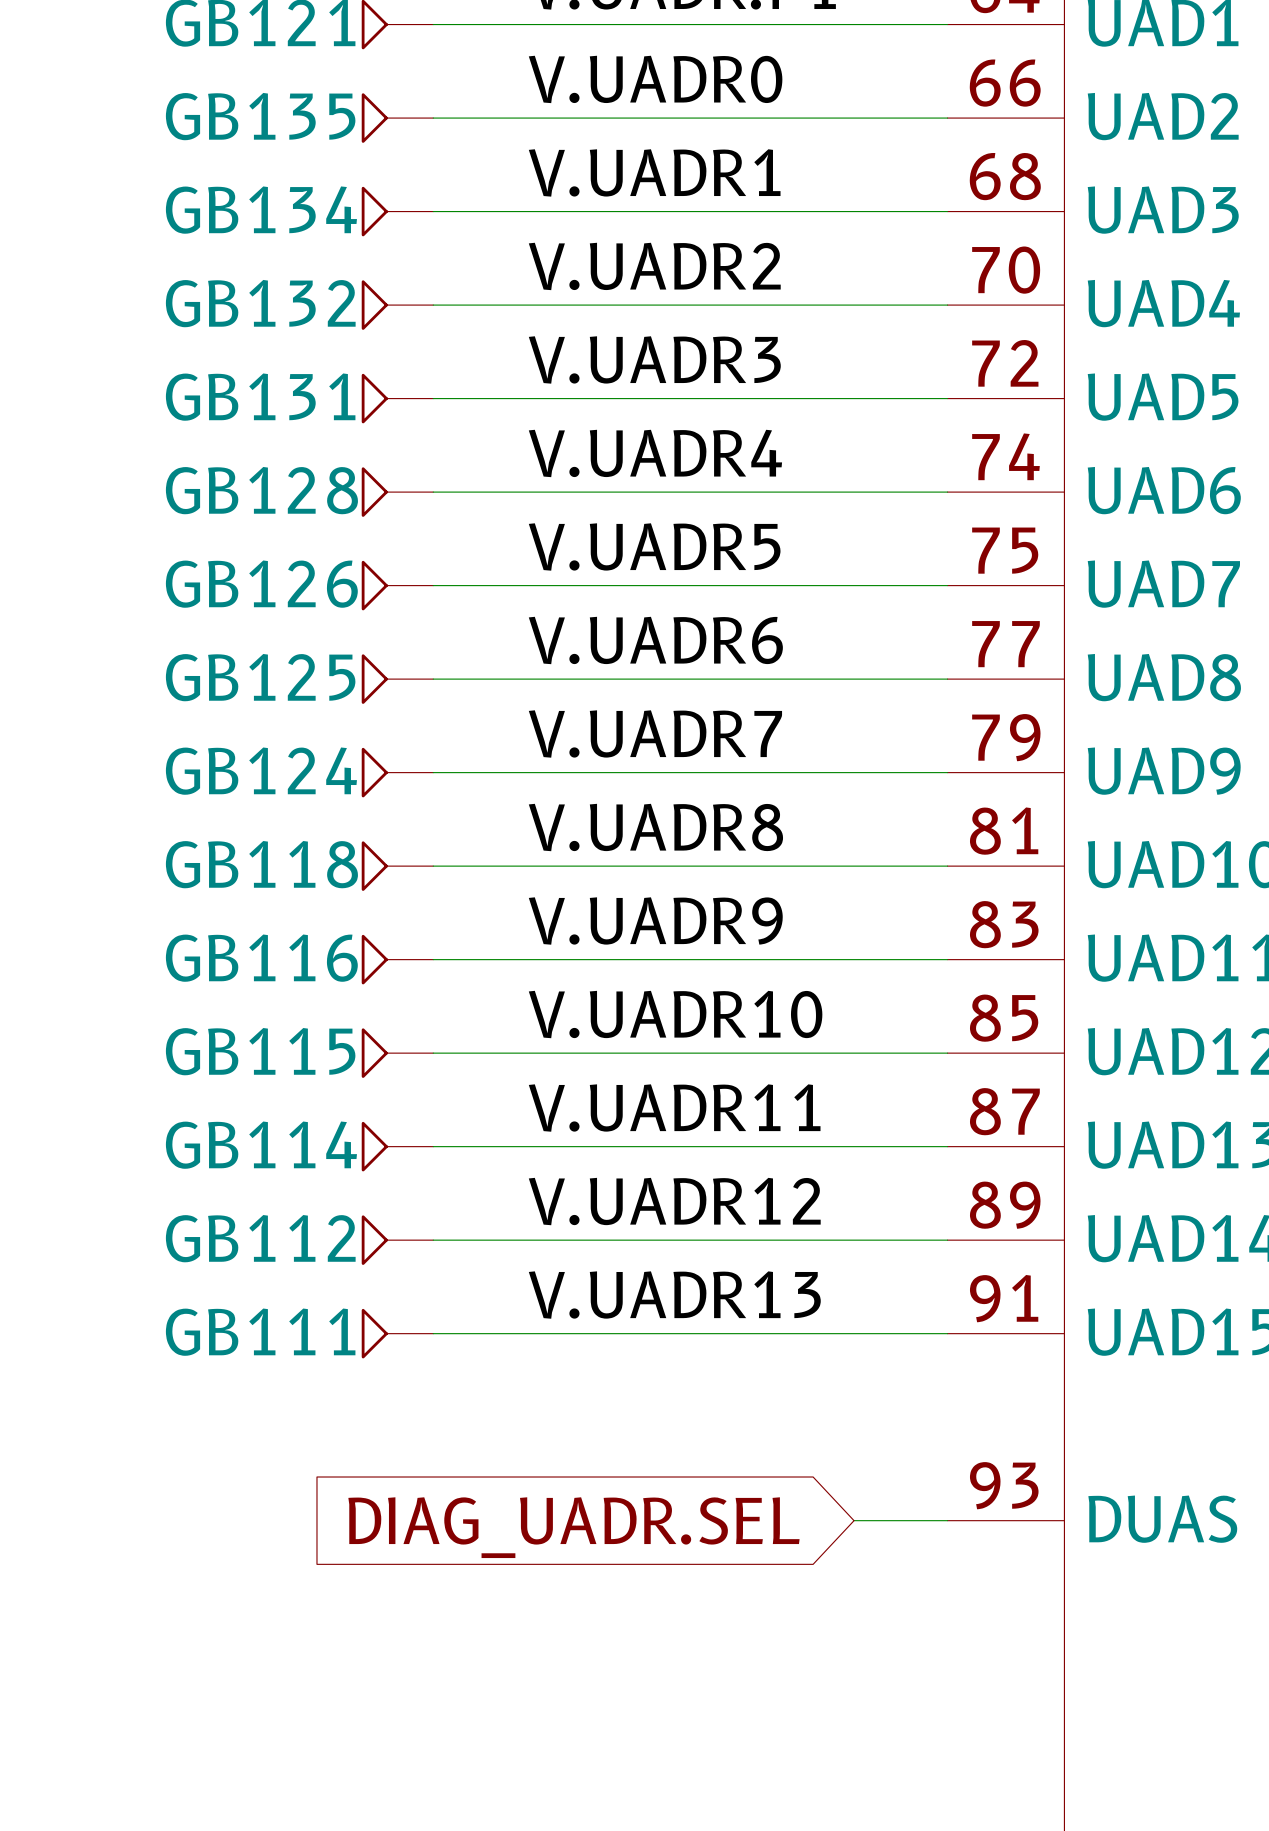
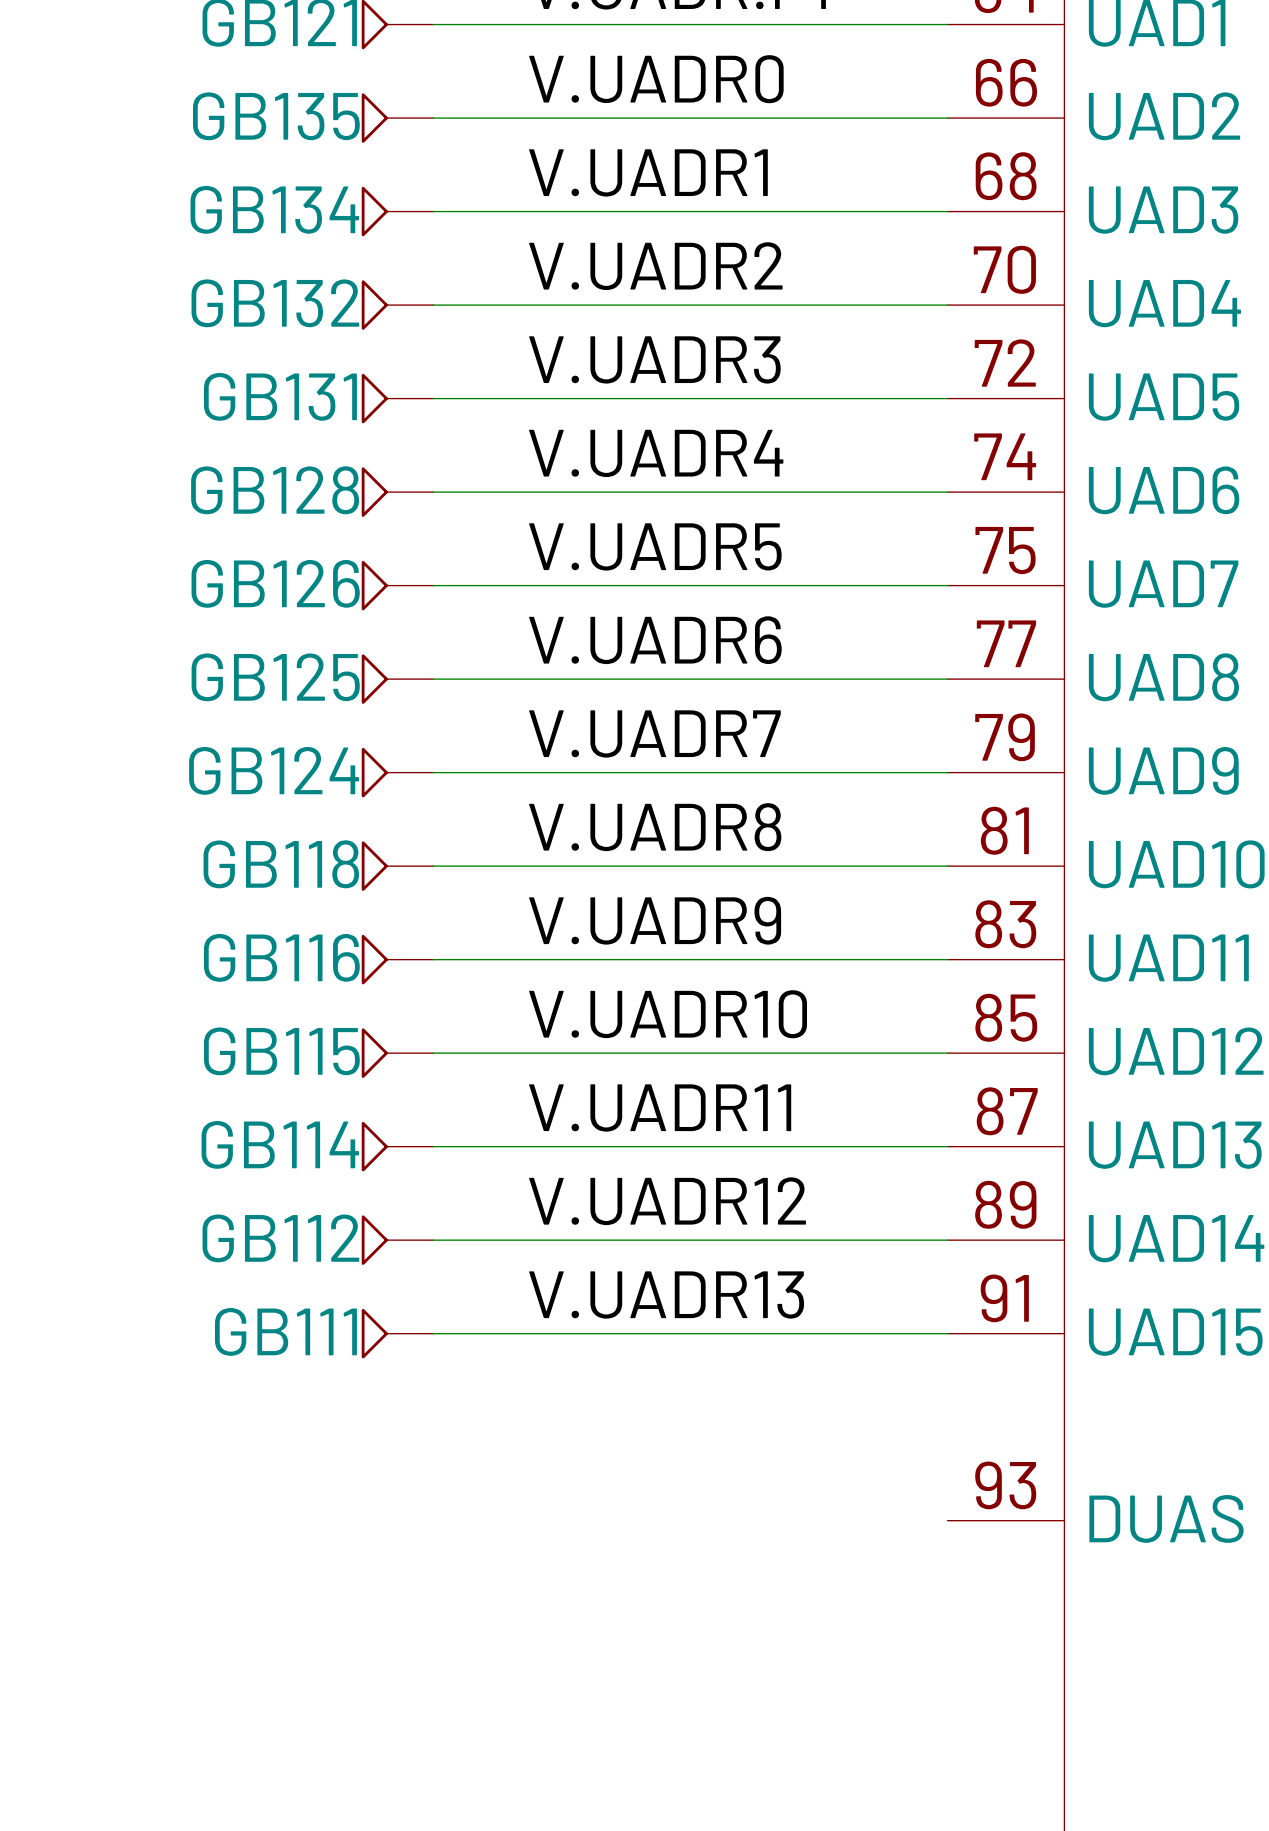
wire: (854, 1520) (947, 1520) -> none
global label: DIAG_UADR.SEL (573, 1527) -> none

